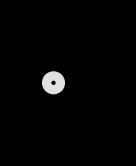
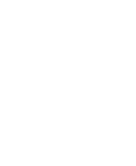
part: (53, 82) -> none

